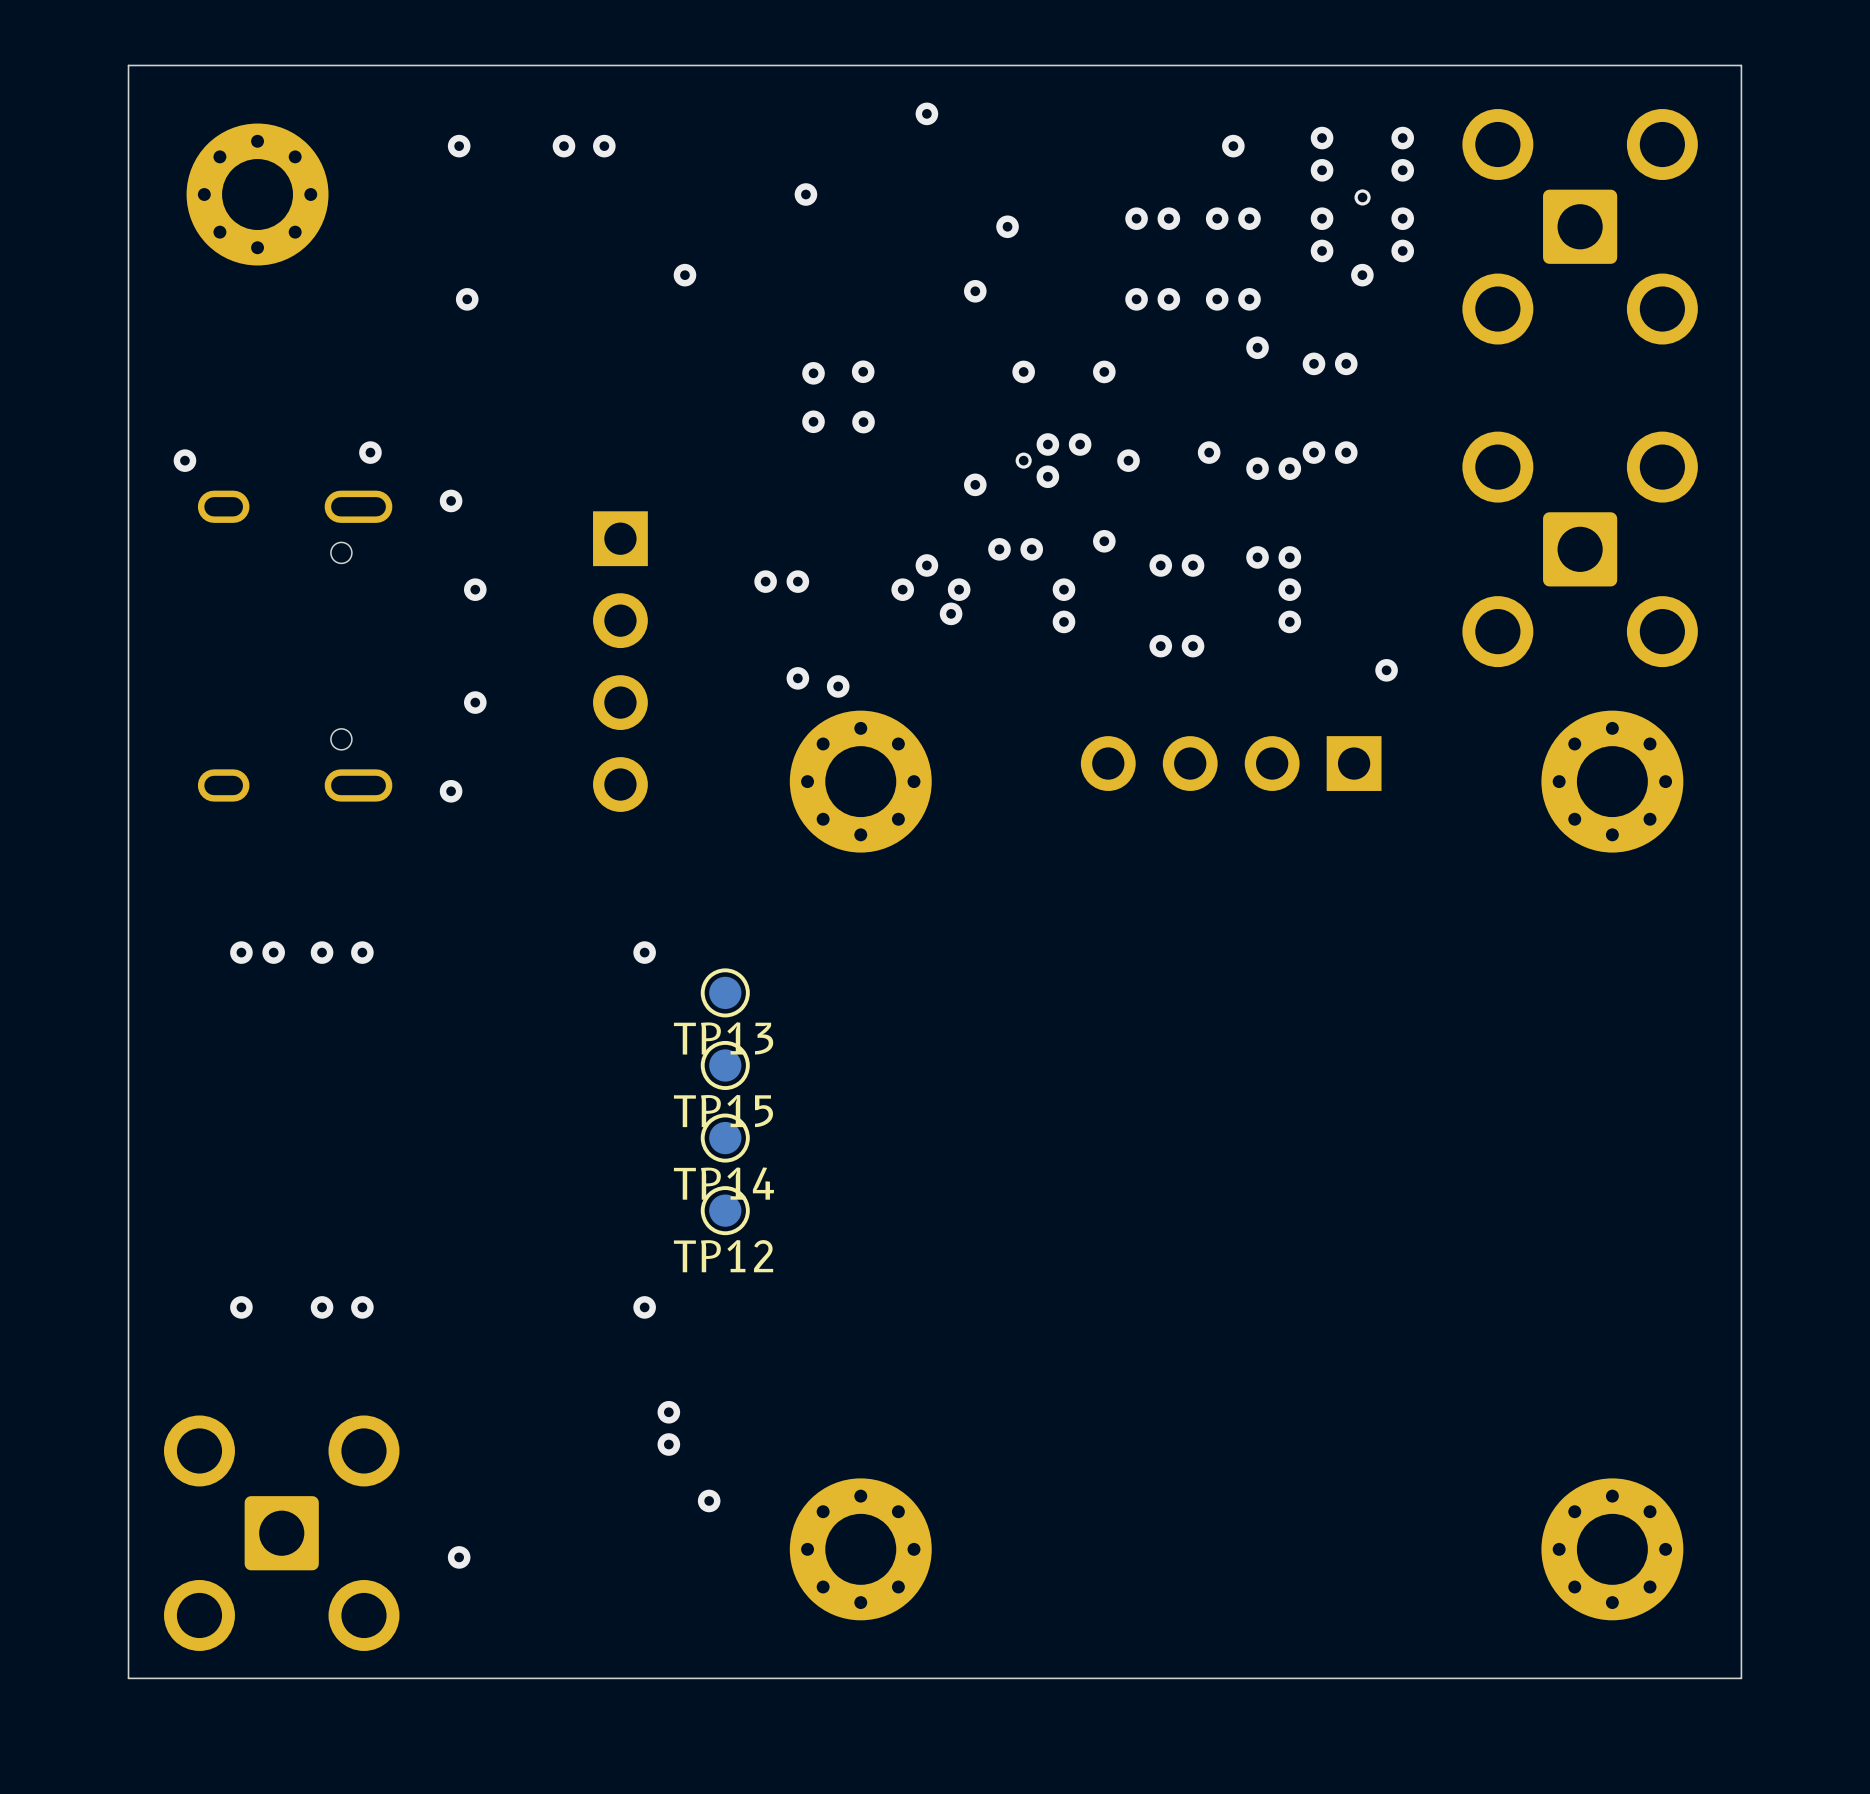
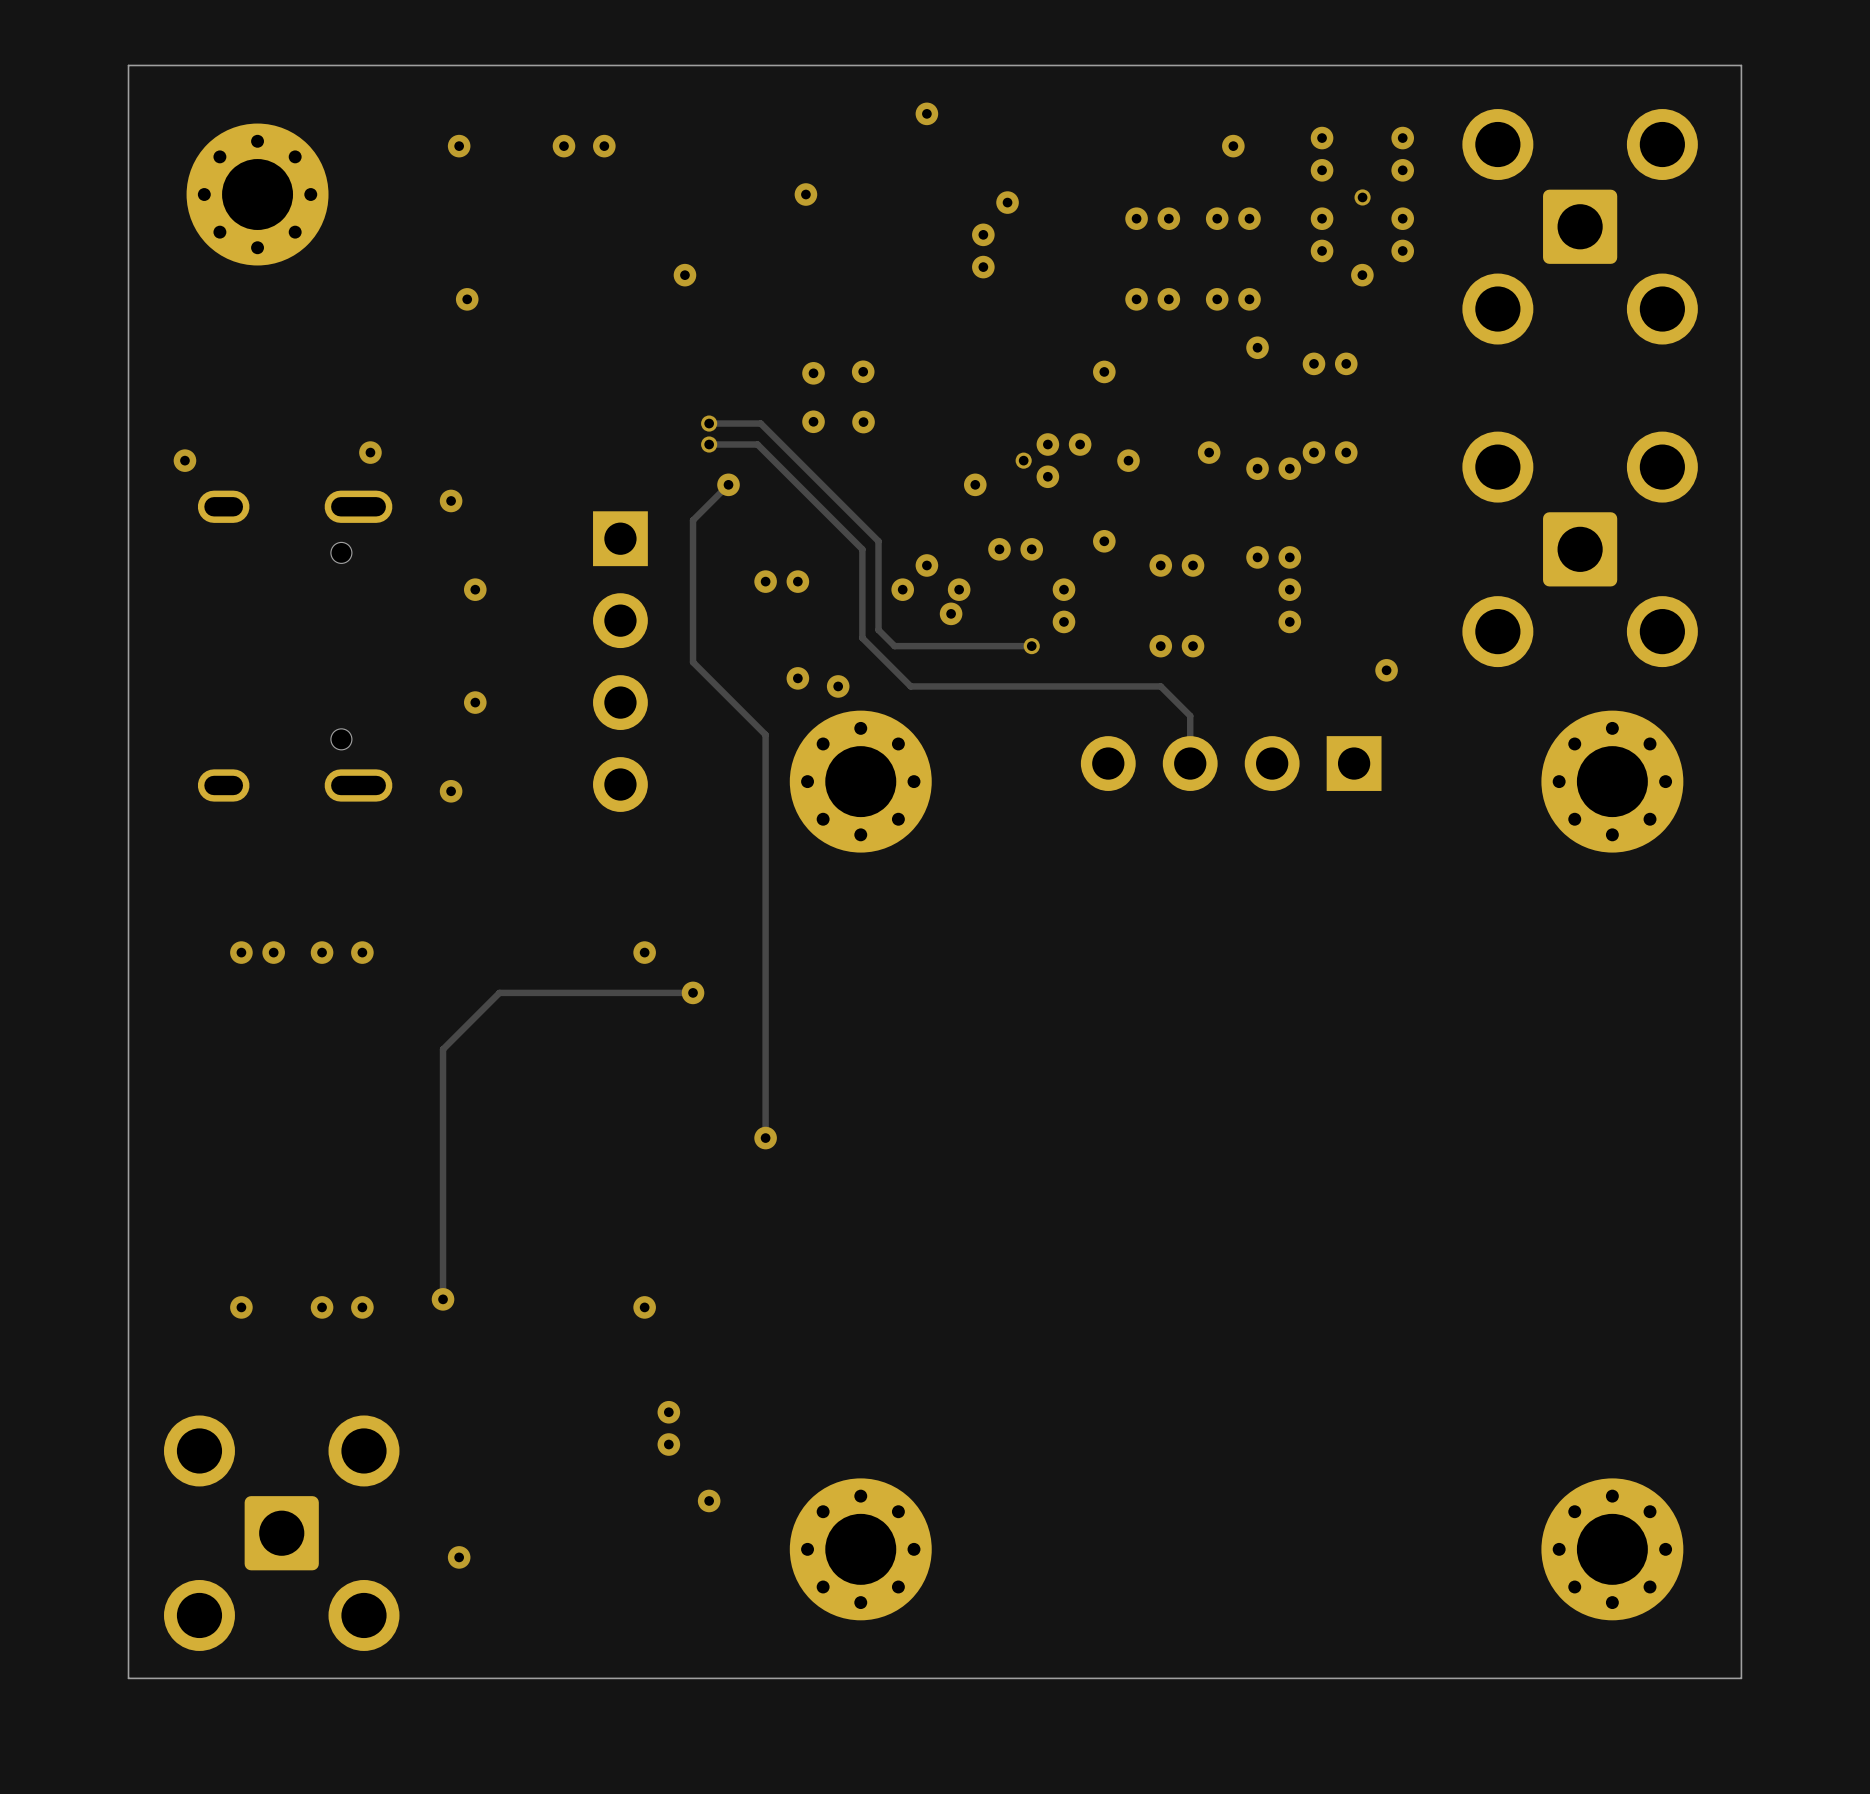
via: none -> (1007, 202)
via: (1007, 226) -> none
via: none -> (983, 234)
via: none -> (983, 267)
via: (975, 291) -> none
via: (1023, 371) -> none
track: none -> (709, 423) (760, 423) (878, 541) (878, 629) (894, 646) (1031, 646)
via: none -> (709, 423)
track: none -> (709, 444) (757, 444) (862, 549) (862, 638) (910, 686) (1160, 686) (1190, 715) (1190, 763)
via: none -> (709, 444)
track: none -> (728, 484) (693, 520) (693, 662) (765, 734) (765, 1138)
via: none -> (728, 484)
via: none -> (1031, 646)
track: none -> (693, 992) (499, 992) (443, 1049) (443, 1299)
via: none -> (693, 992)
TP13: (725, 992) -> none
TP15: (725, 1065) -> none
TP14: (725, 1138) -> none
via: none -> (765, 1138)
TP12: (725, 1210) -> none
via: none -> (443, 1299)

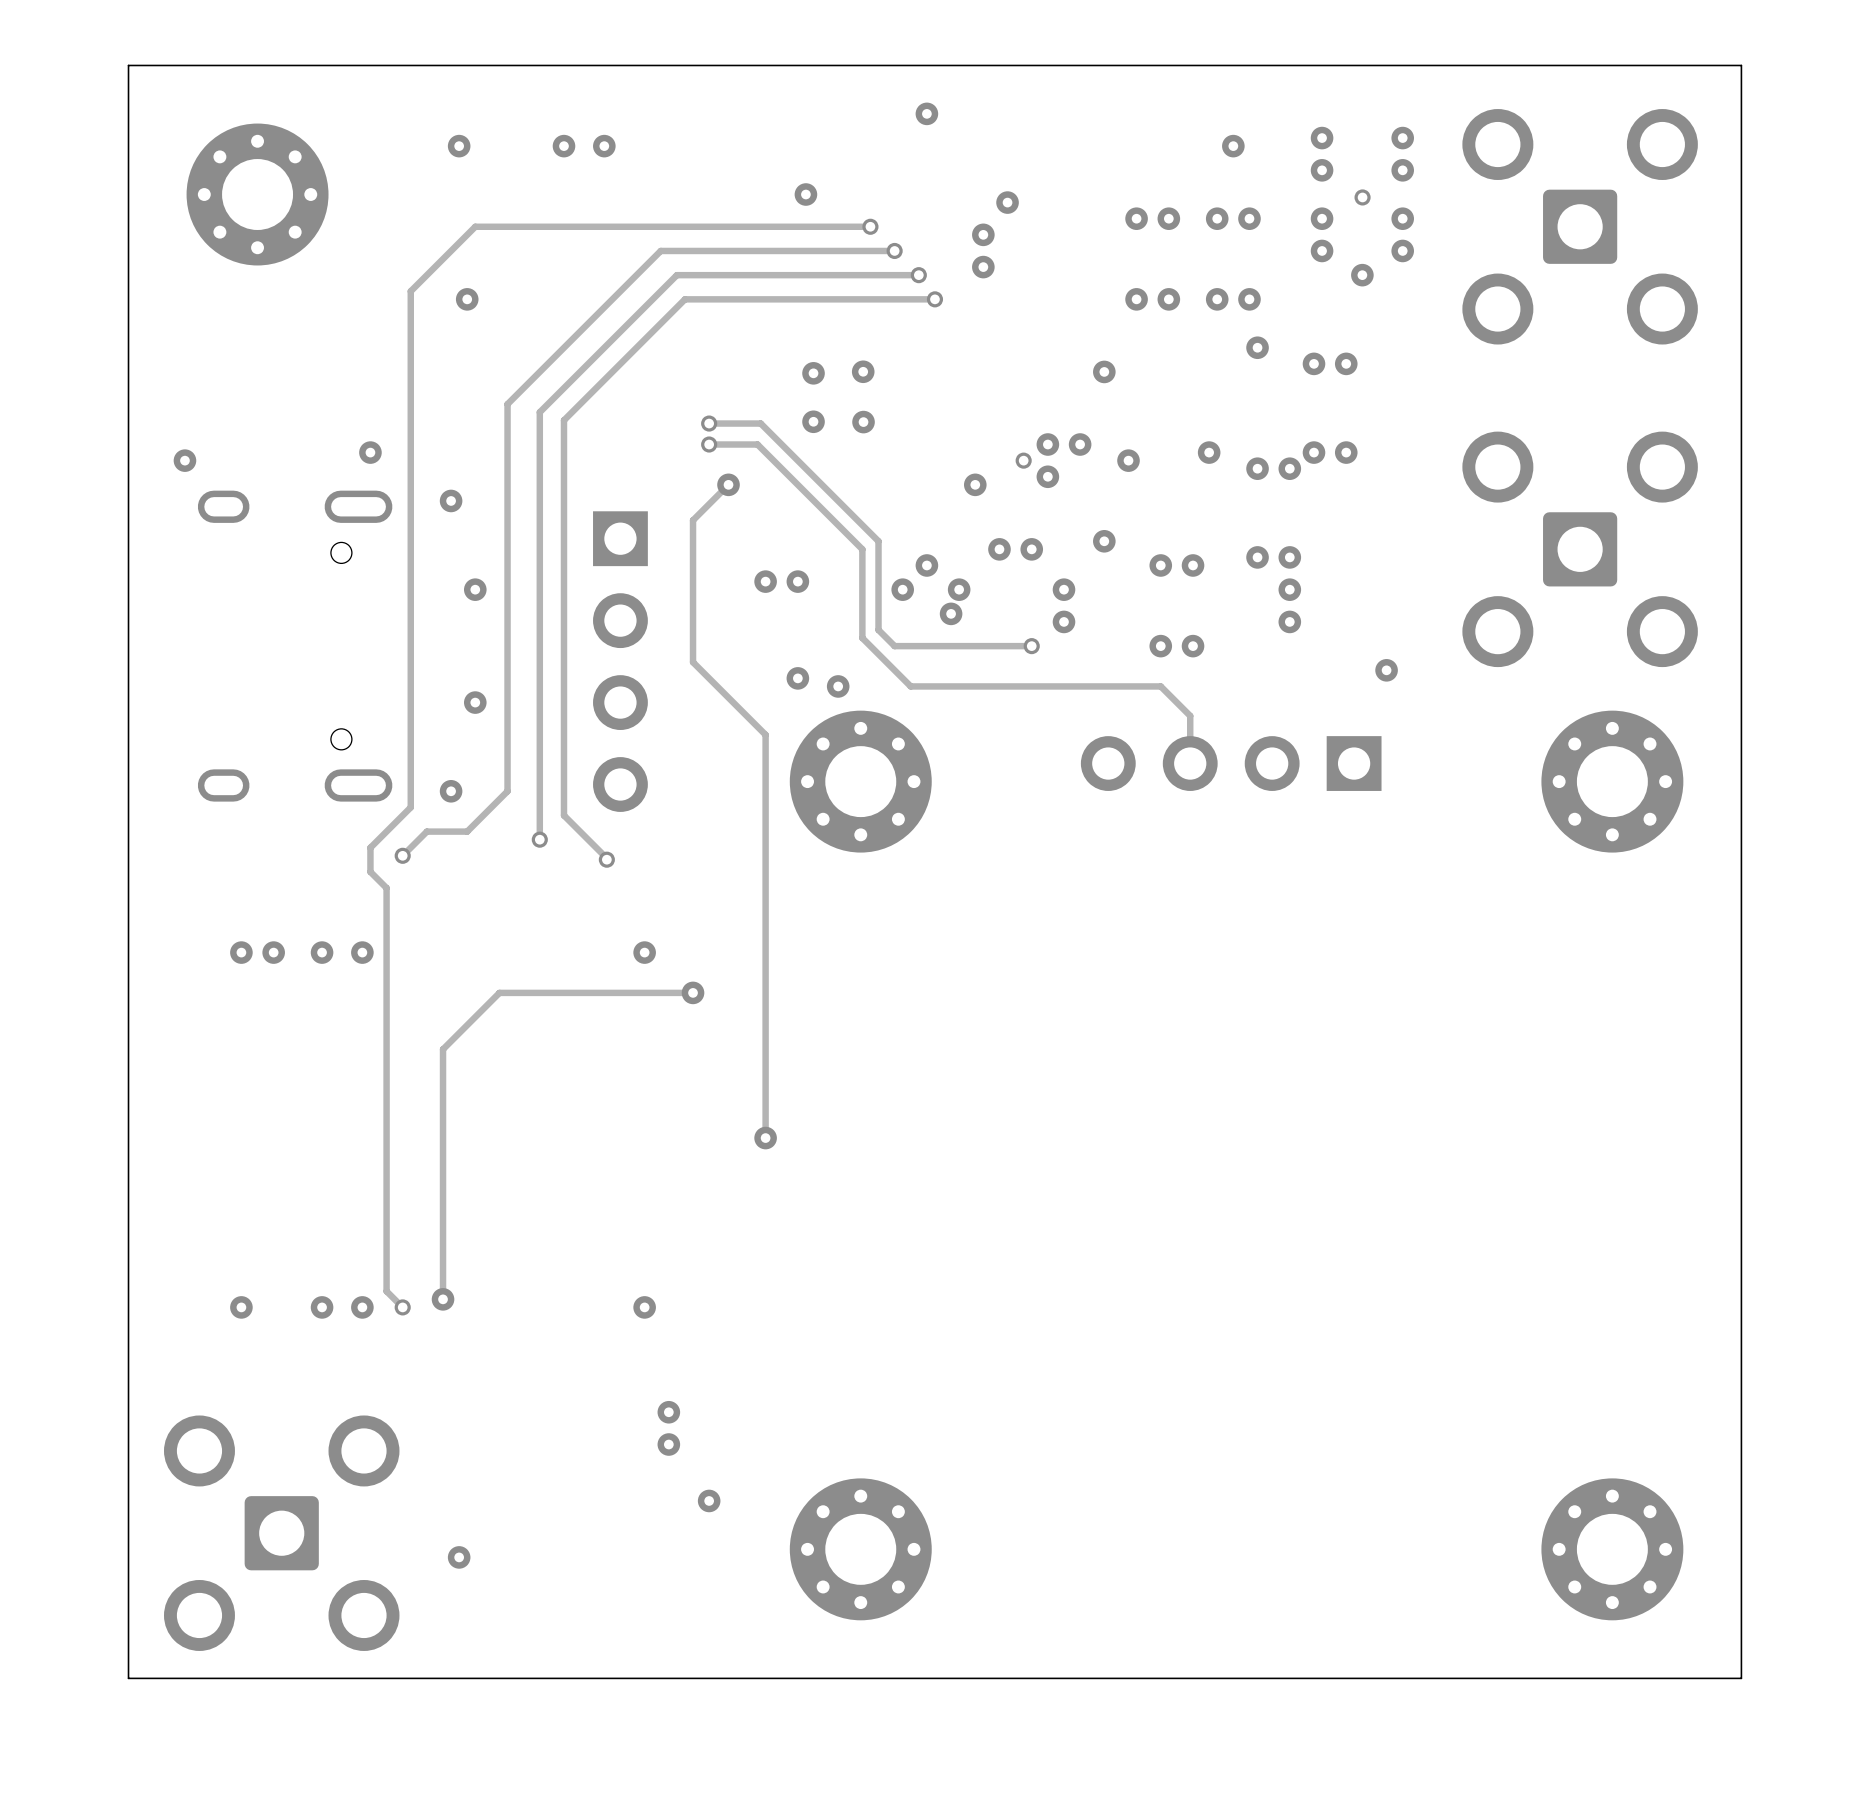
track: none -> (870, 226) (475, 226) (410, 291) (410, 807) (370, 847) (370, 871) (386, 888) (386, 1291) (402, 1307)
via: none -> (870, 226)
track: none -> (894, 250) (660, 250) (507, 404) (507, 791) (467, 831) (426, 831) (402, 855)
via: none -> (894, 250)
via: (684, 275) -> none
track: none -> (918, 275) (676, 275) (539, 412) (539, 839)
via: none -> (918, 275)
track: none -> (934, 299) (684, 299) (563, 420) (563, 815) (606, 859)
via: none -> (934, 299)
via: none -> (539, 839)
via: none -> (402, 855)
via: none -> (606, 859)
via: none -> (402, 1307)

